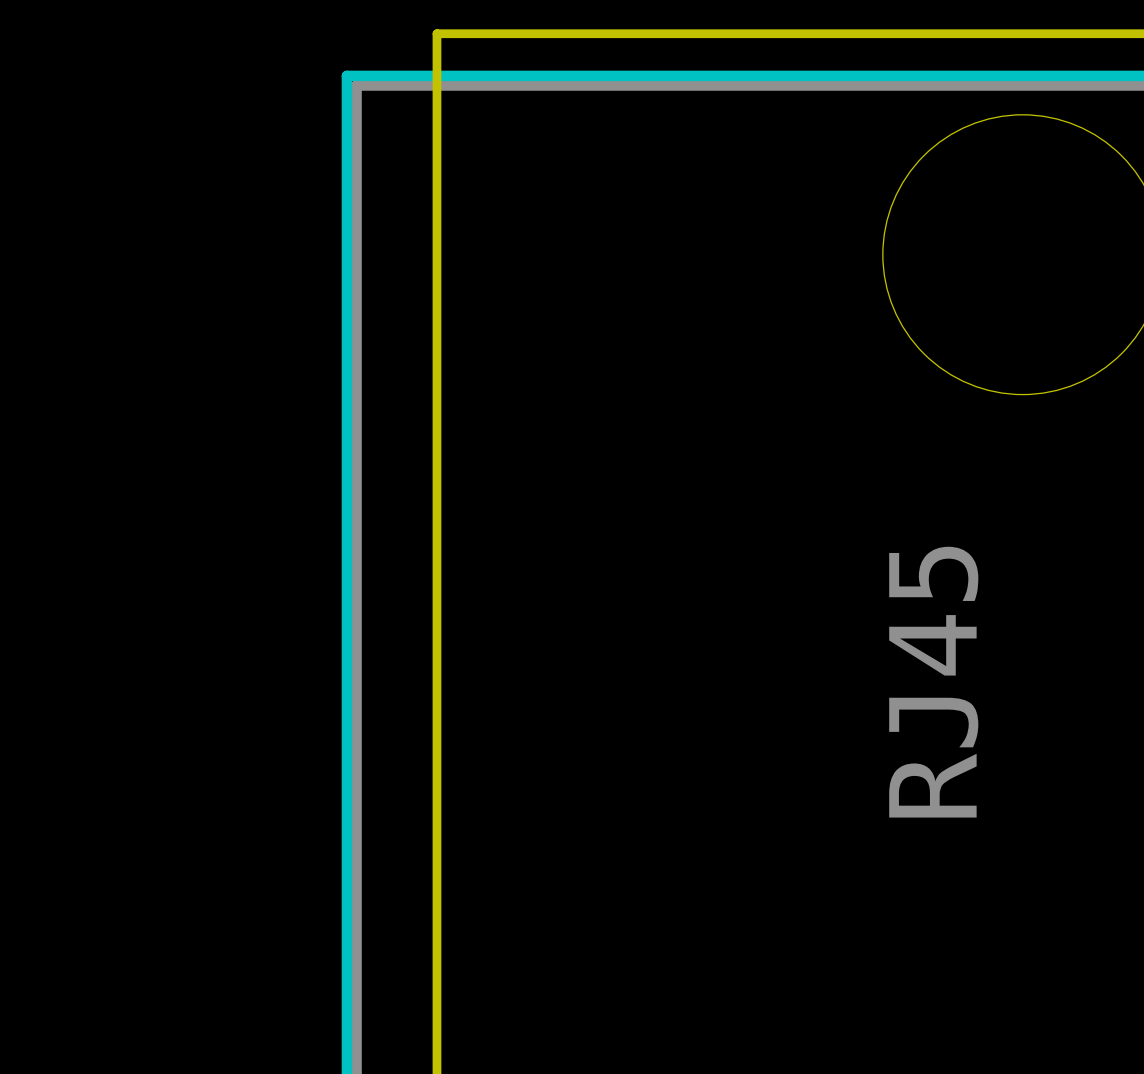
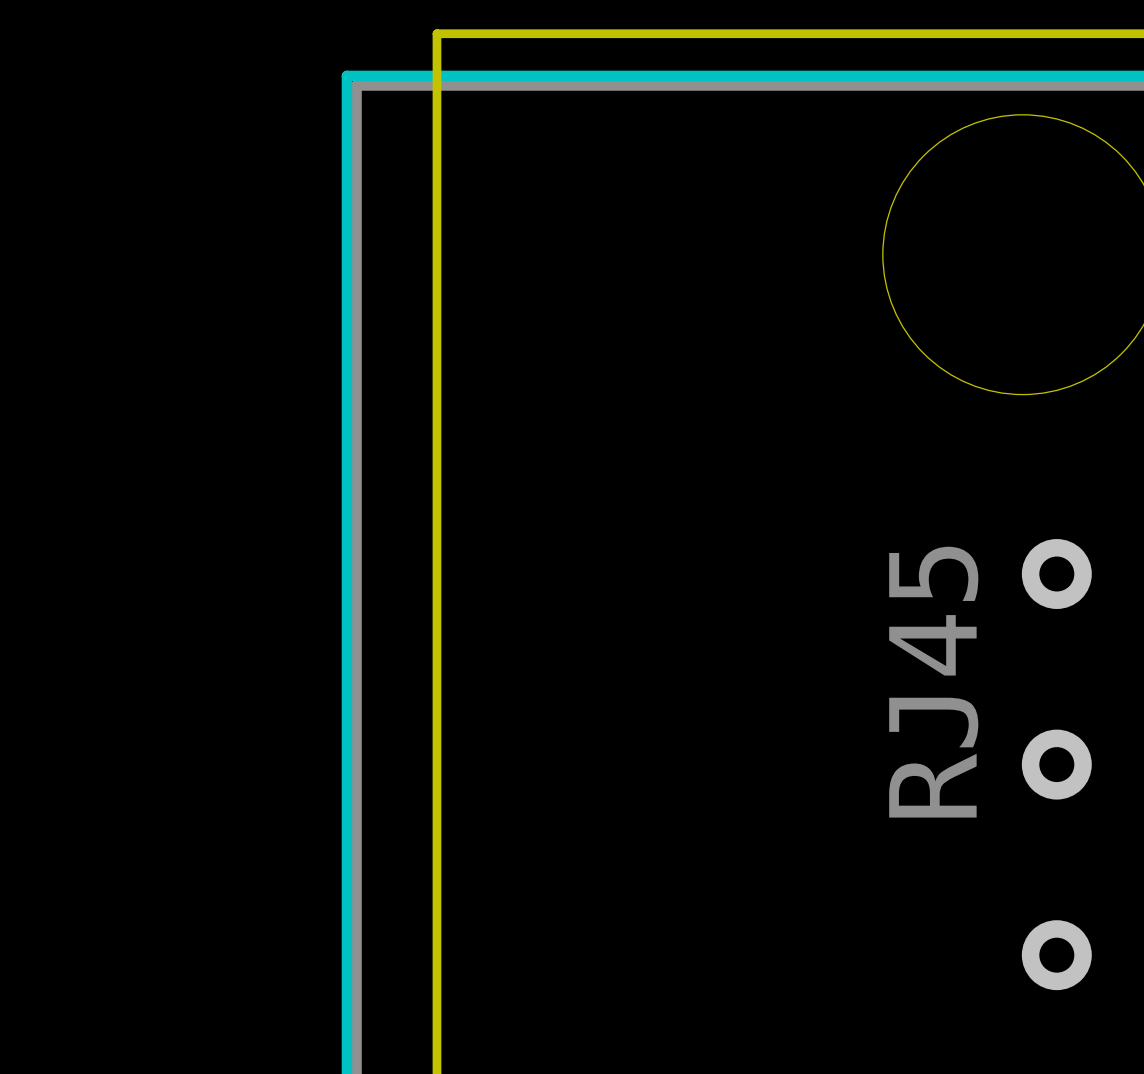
via: none -> (1056, 574)
via: none -> (1056, 764)
via: none -> (1056, 955)

